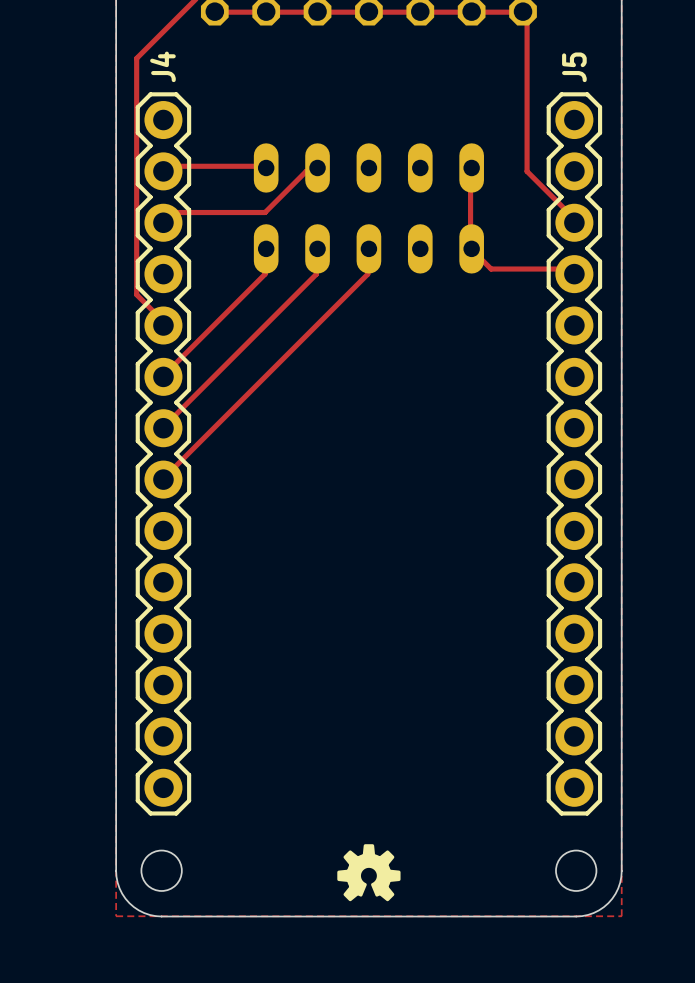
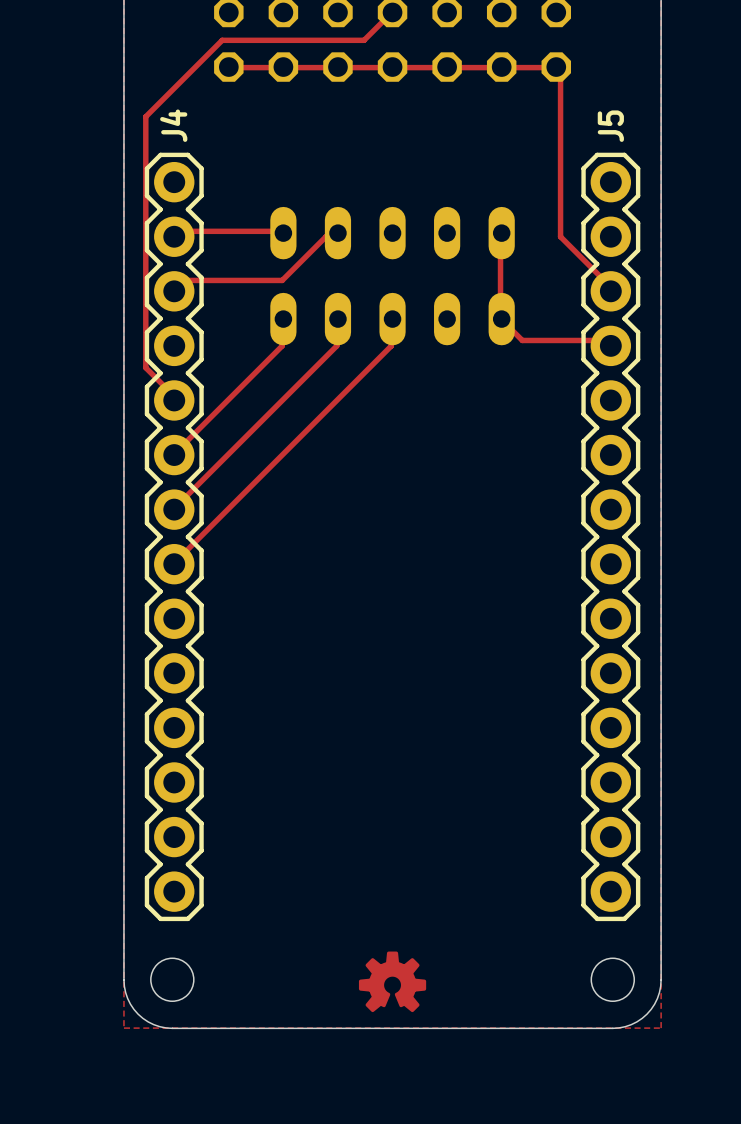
drawing shape: [337, 844, 401, 902] -> [358, 951, 427, 1013]

